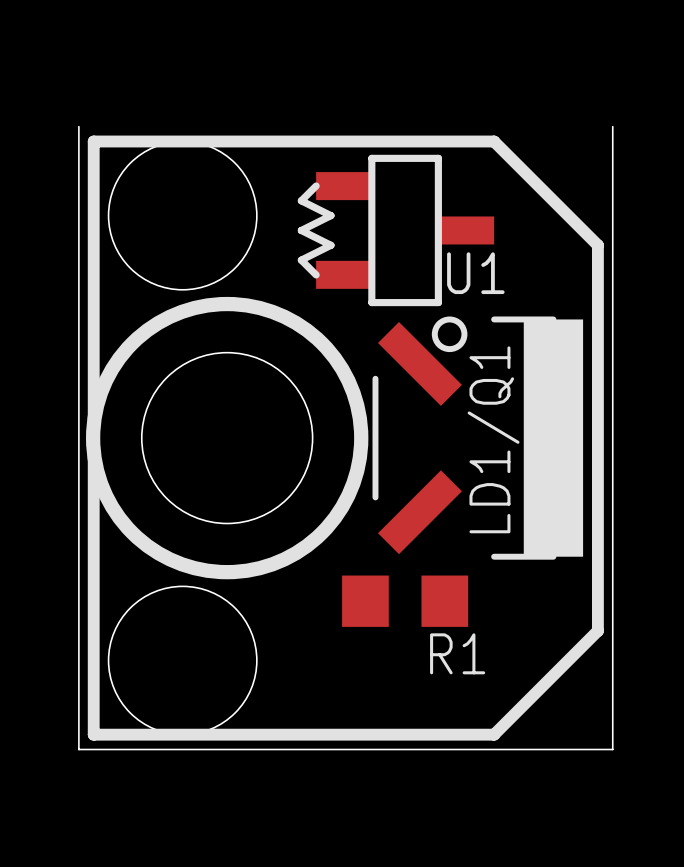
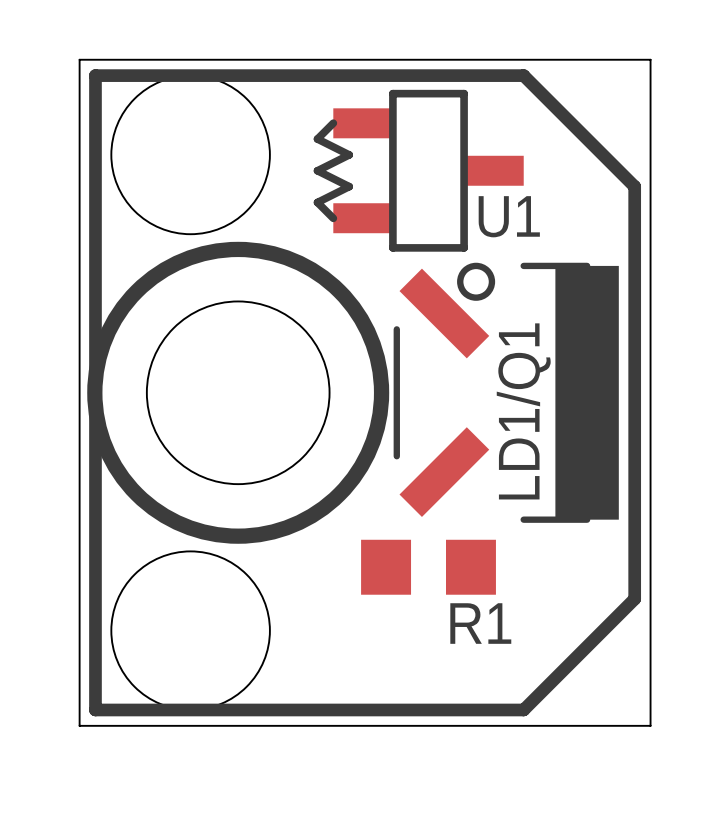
board edge: none -> (79, 59) (650, 59)

